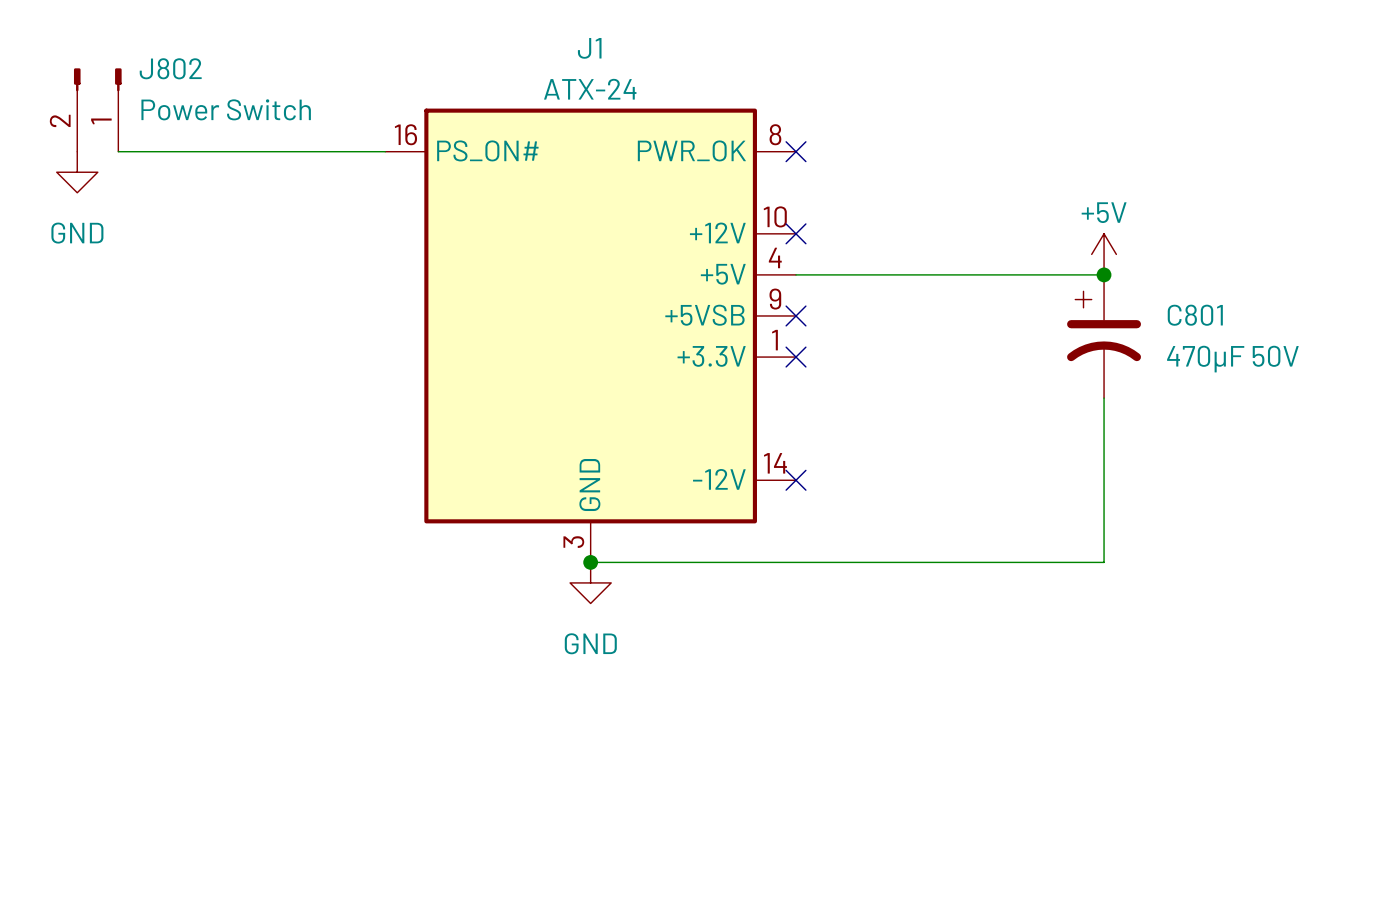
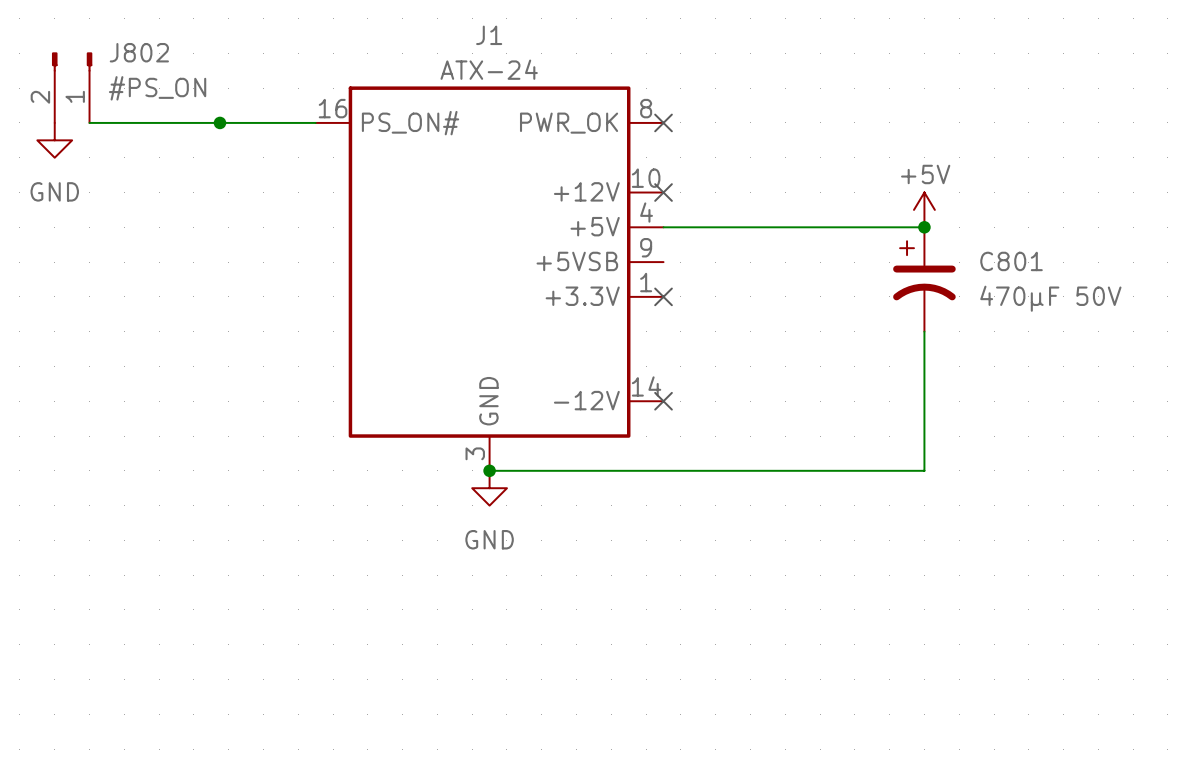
J802 value: Power Switch (226, 109) -> #PS_ON (157, 88)
junction: none -> (219, 122)
no-connect mark: (796, 315) -> none

